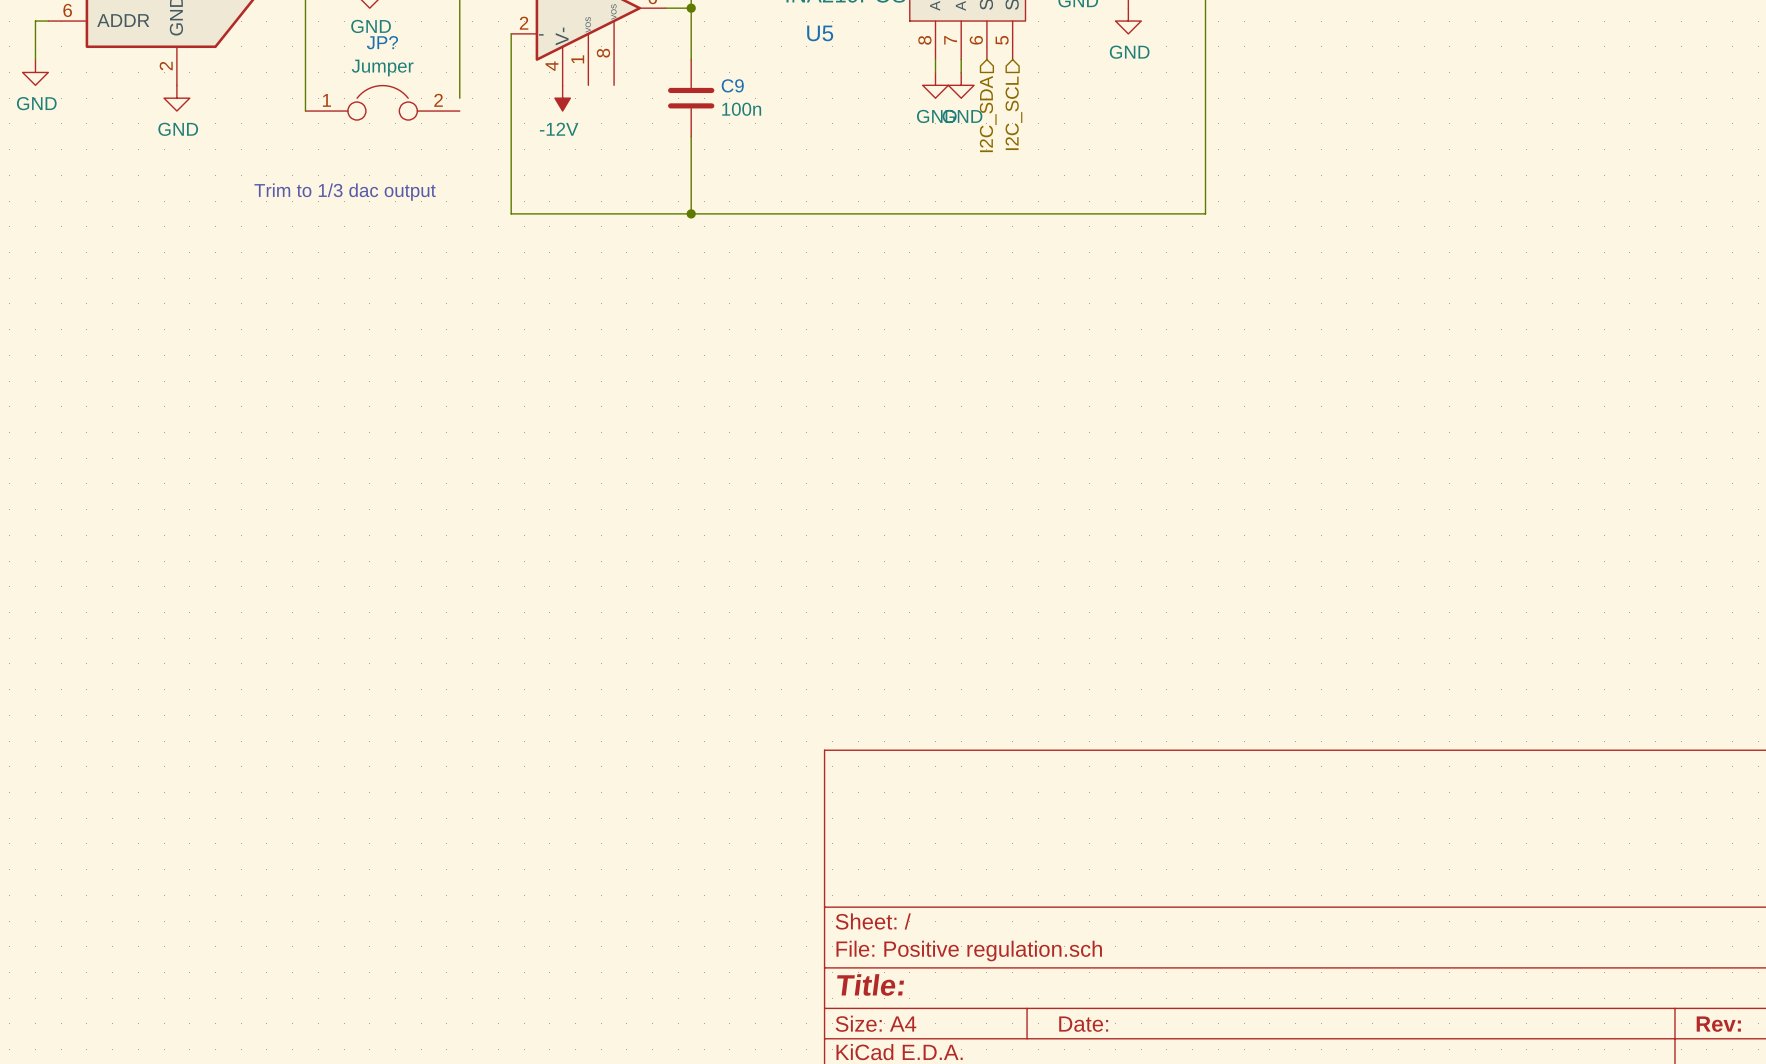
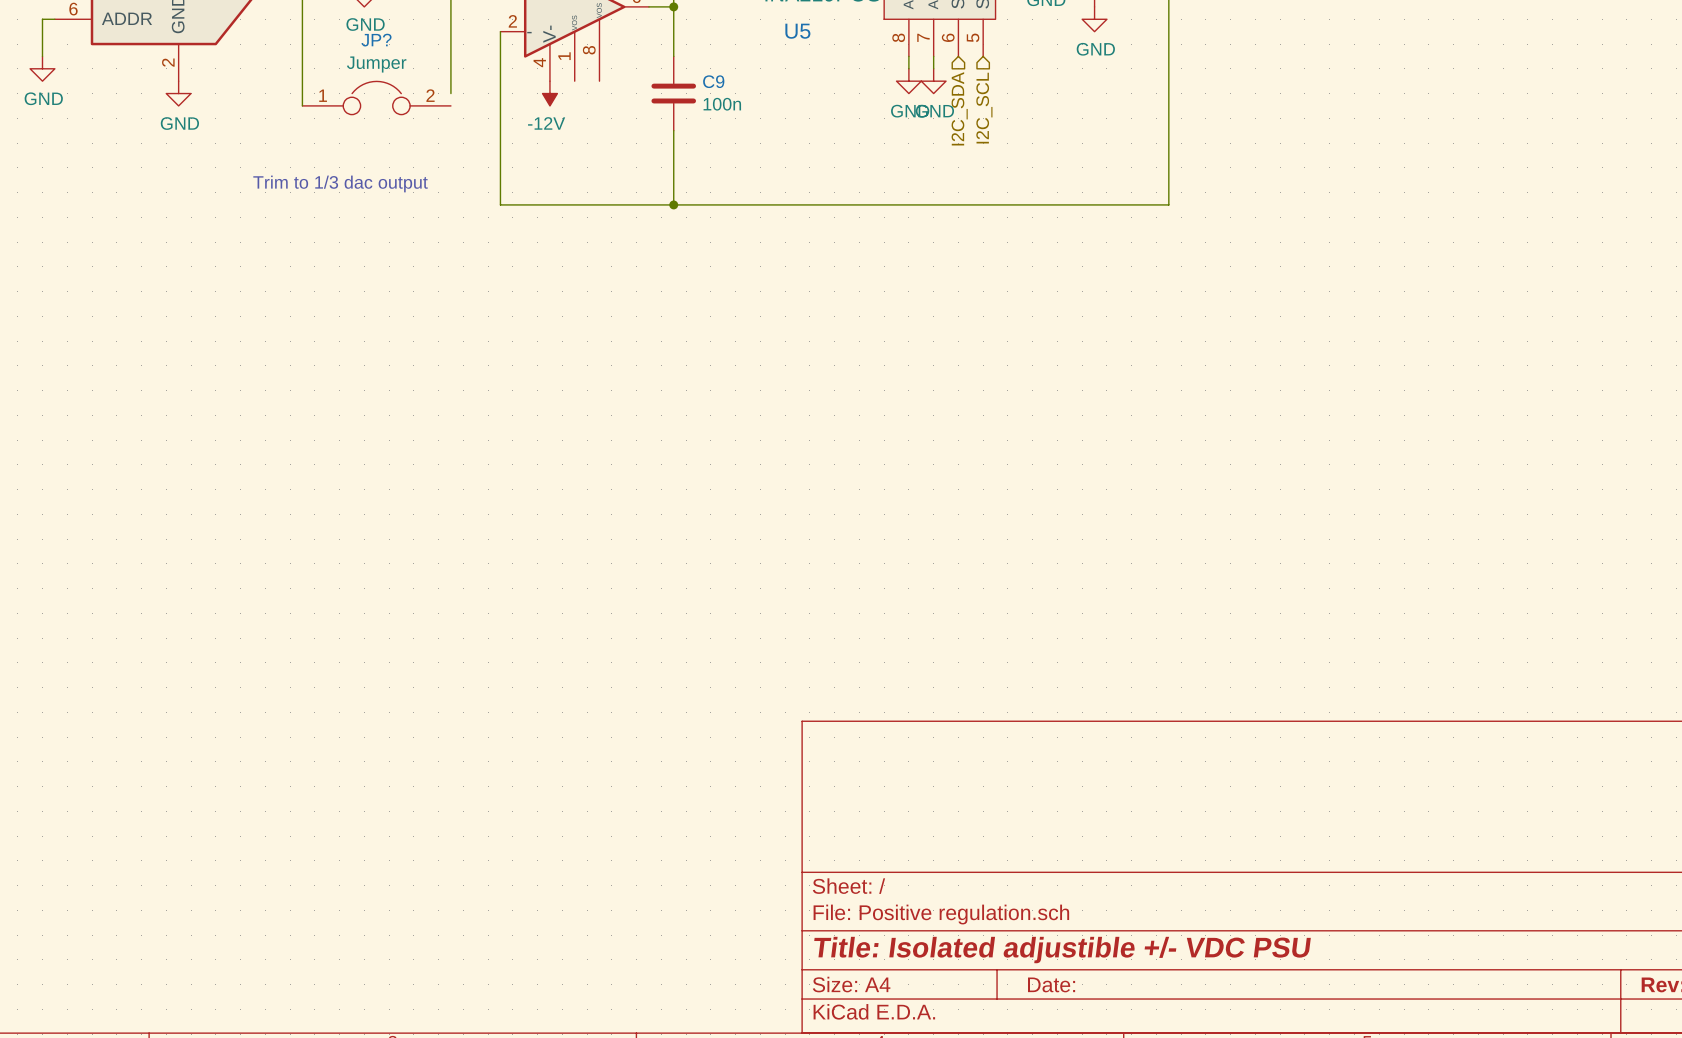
title block: Title: (870, 984) -> Title: Isolated adjustible +/- VDC PSU (1062, 950)

